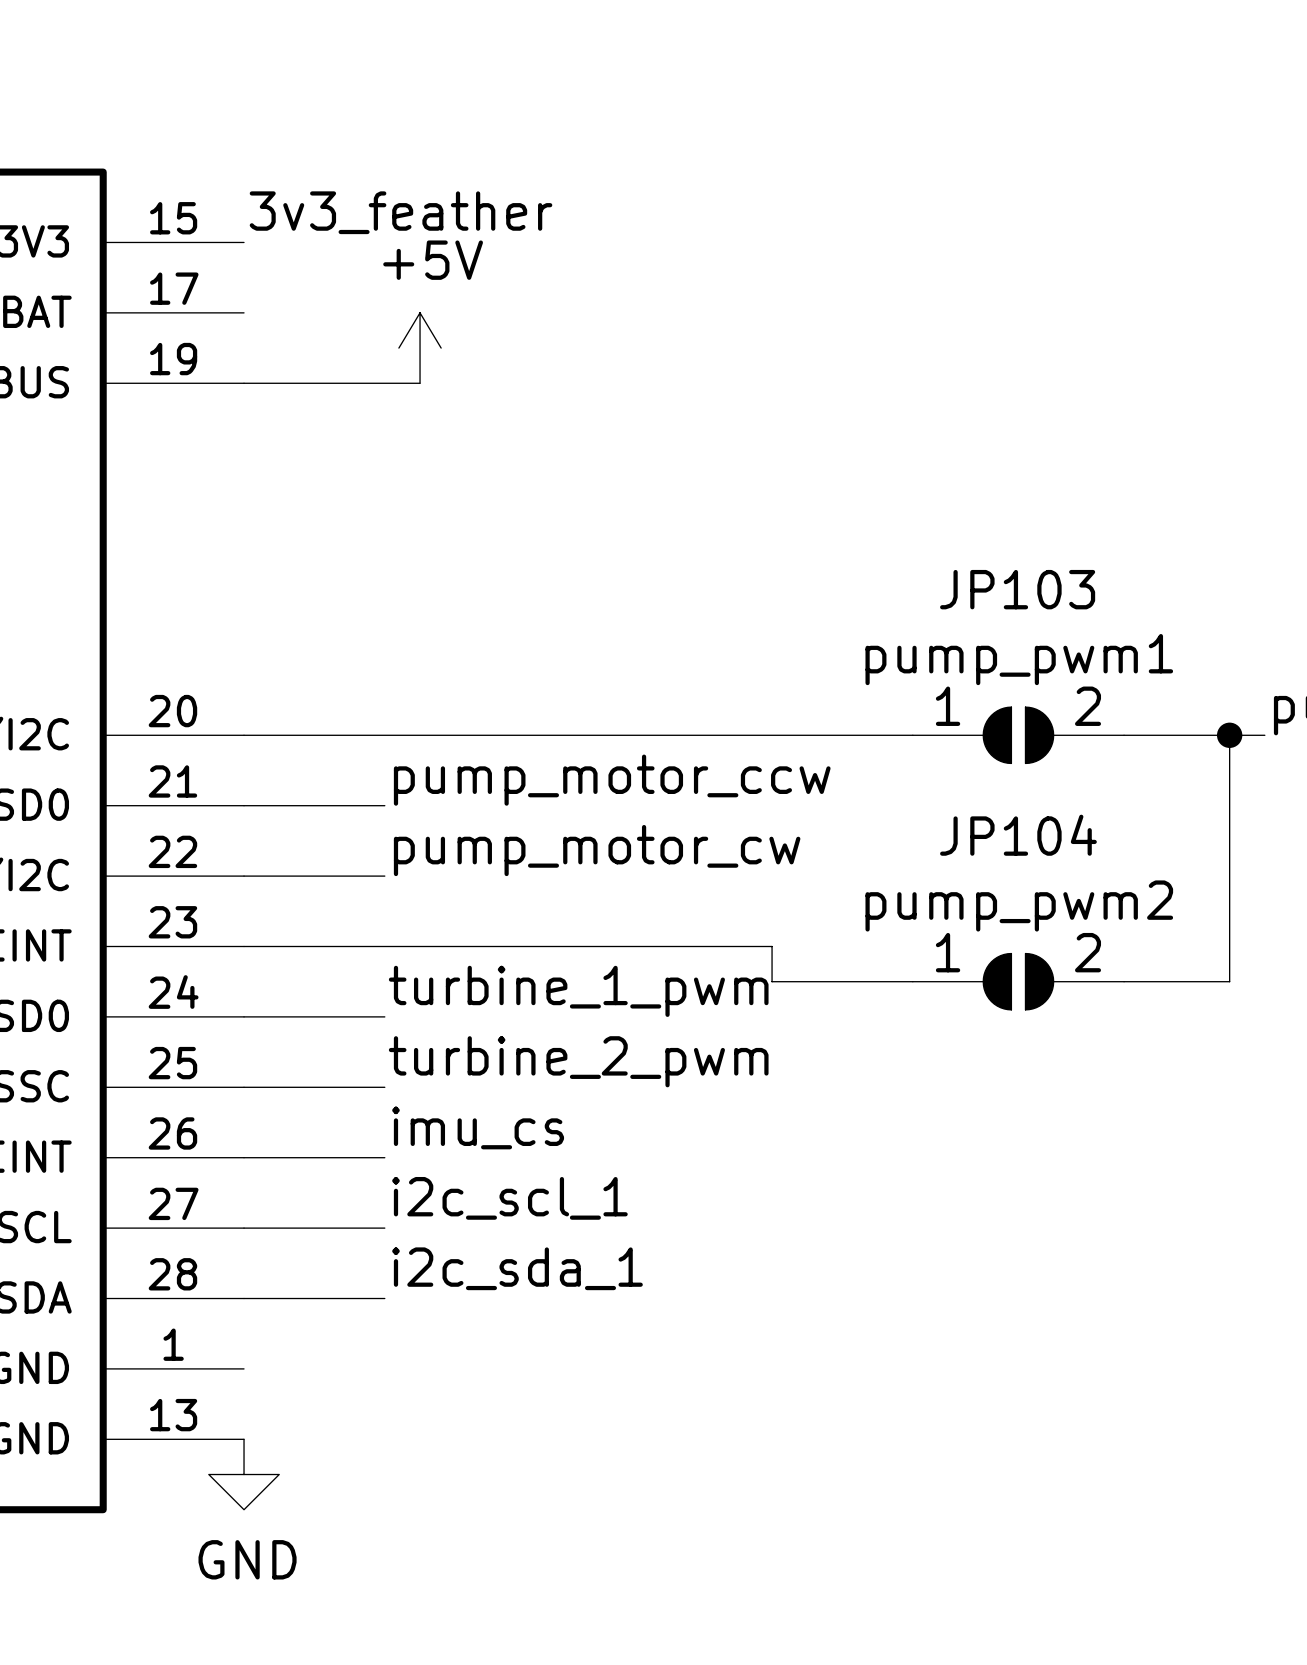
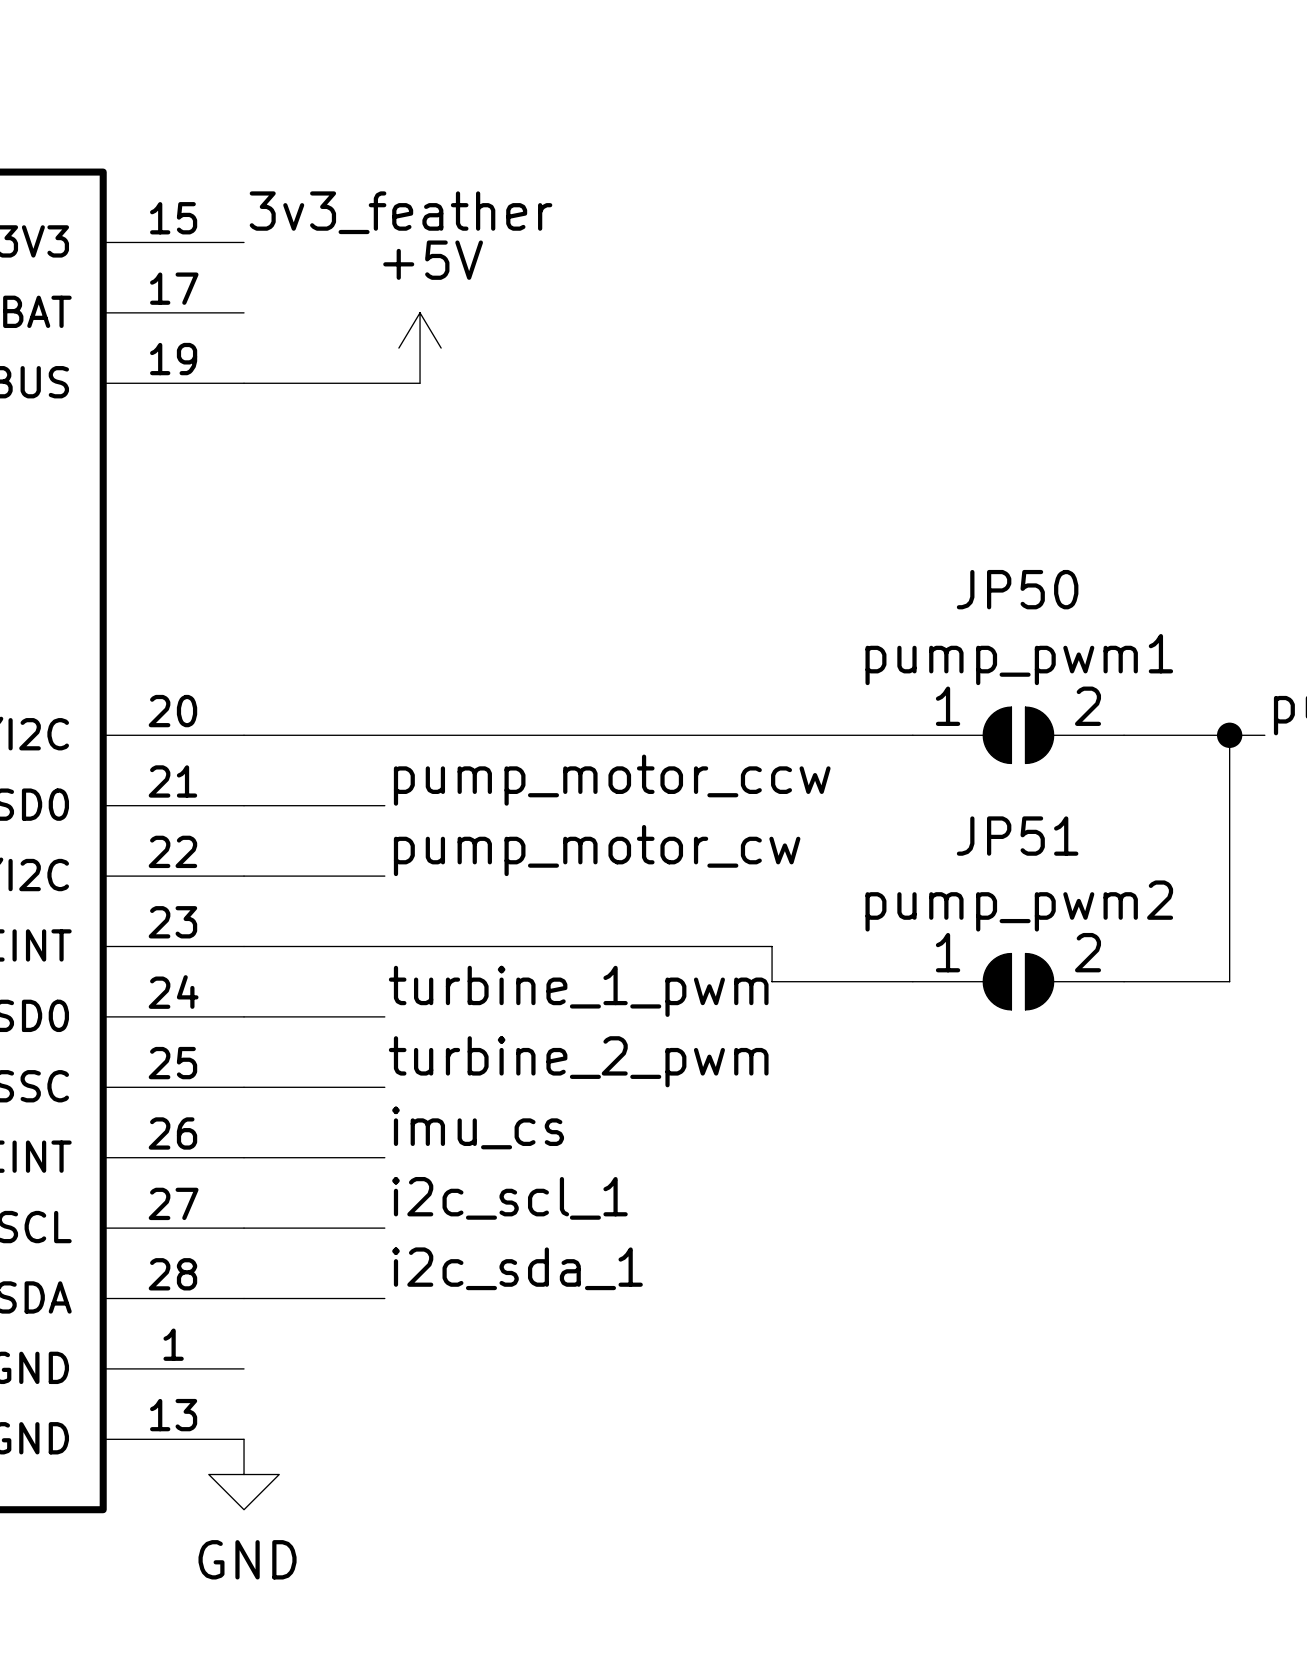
JP103 name: JP103 (1017, 589) -> JP50 (1017, 589)
JP104 name: JP104 (1018, 835) -> JP51 (1017, 836)

